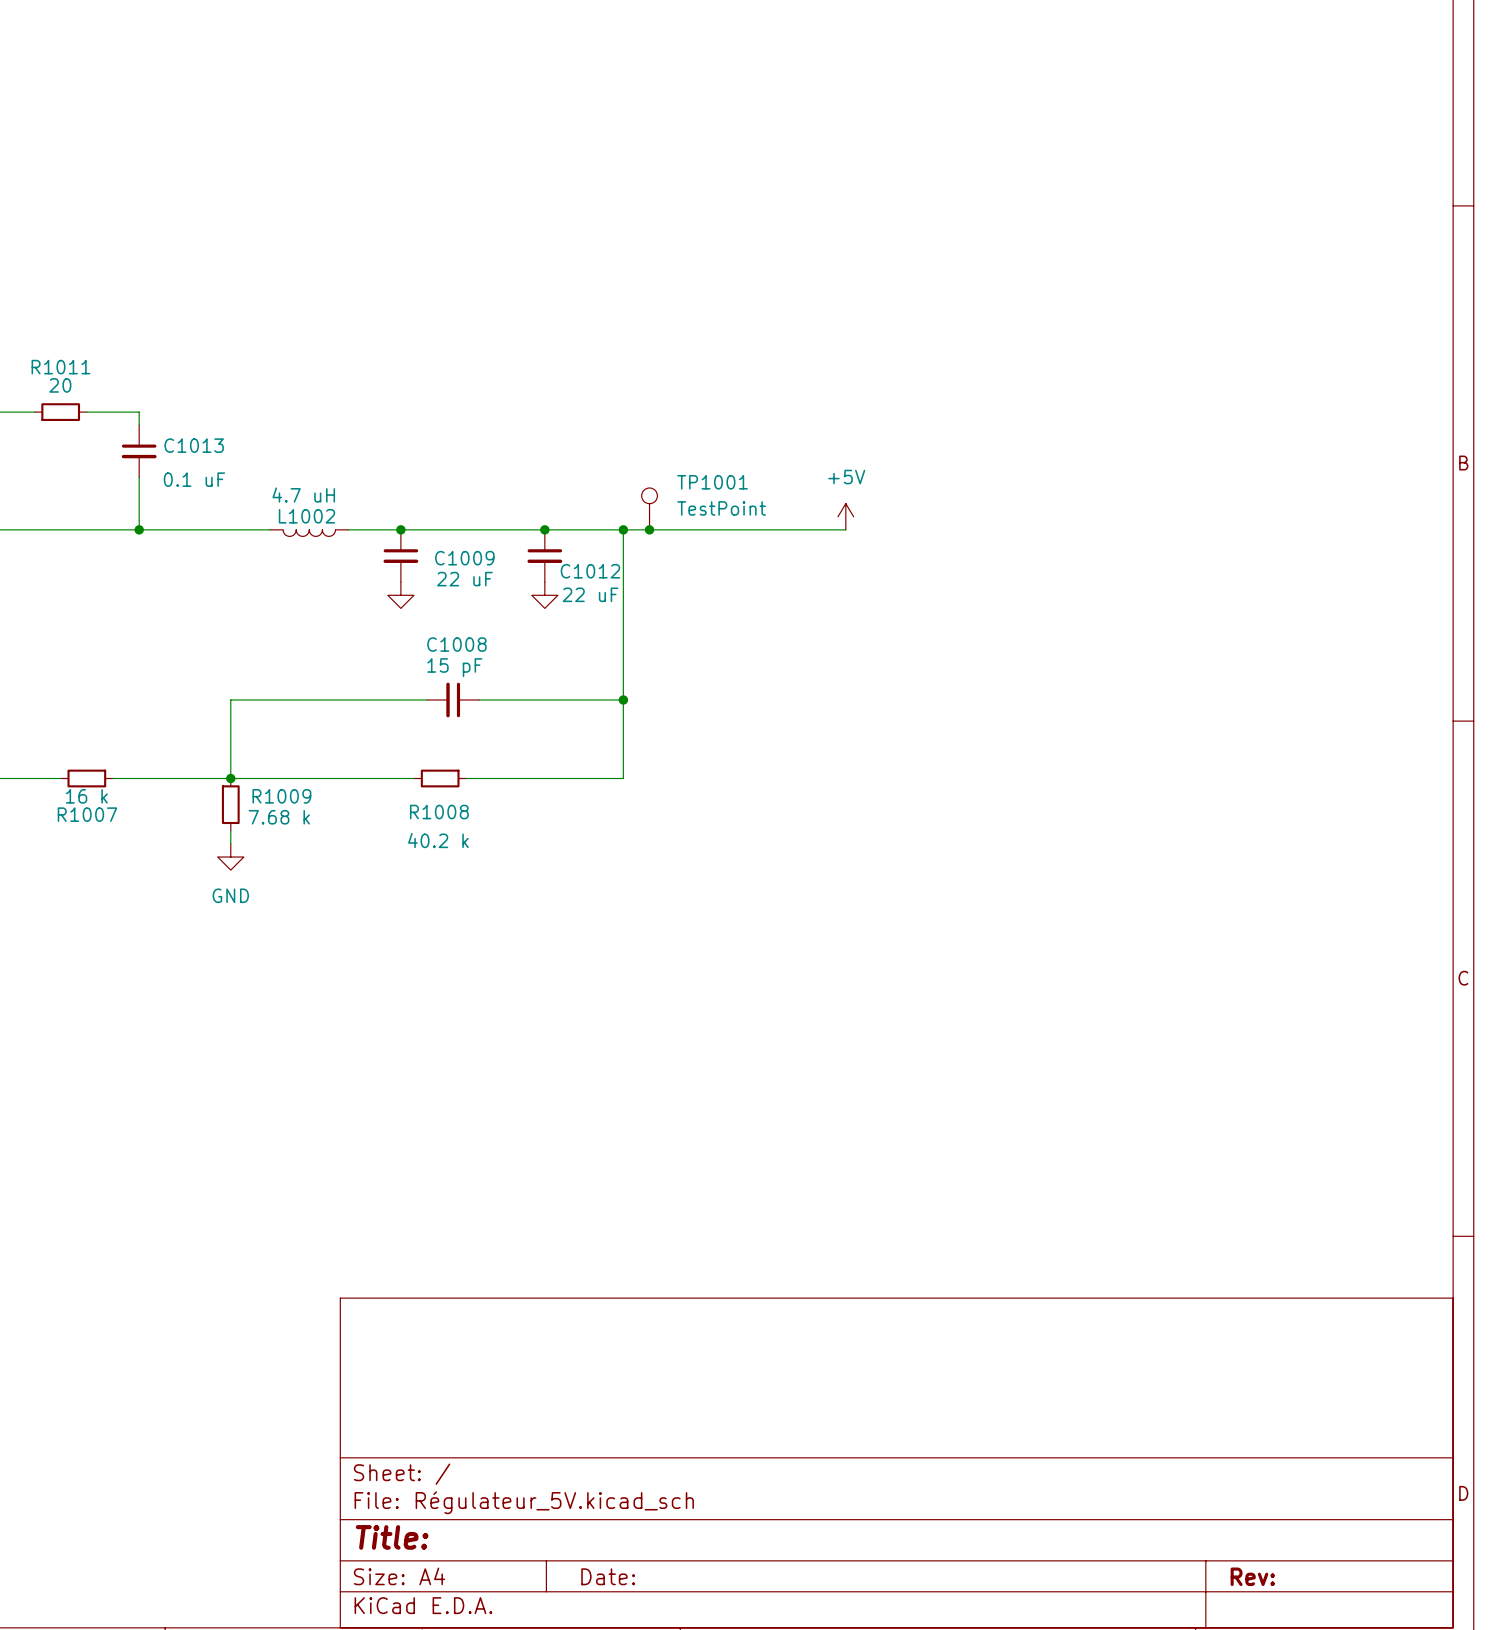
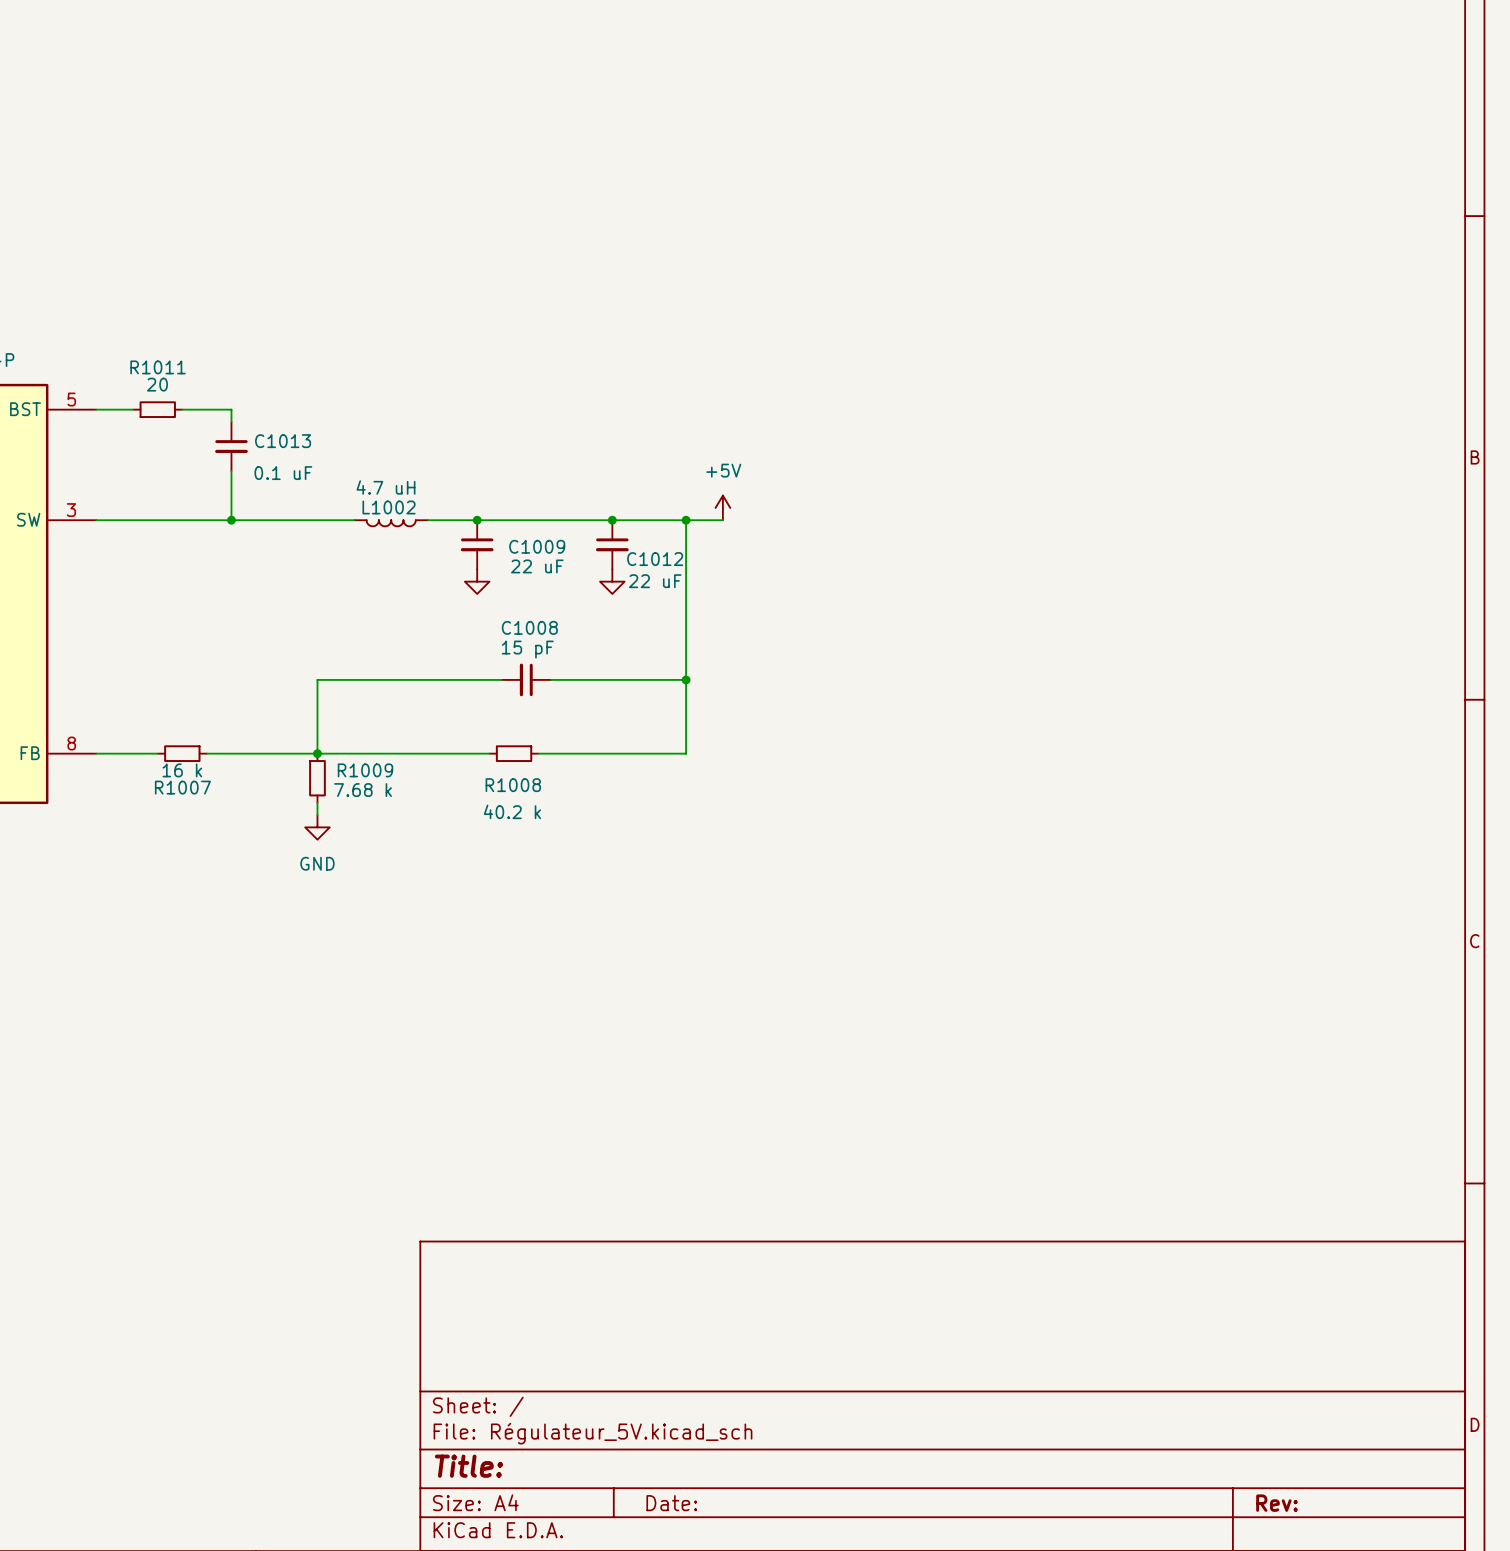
TP1001: TestPoint (649, 508) -> none
power symbol position: +5V (845, 516) -> +5V (722, 507)
junction: (649, 529) -> none
wire: (662, 529) (845, 529) -> none

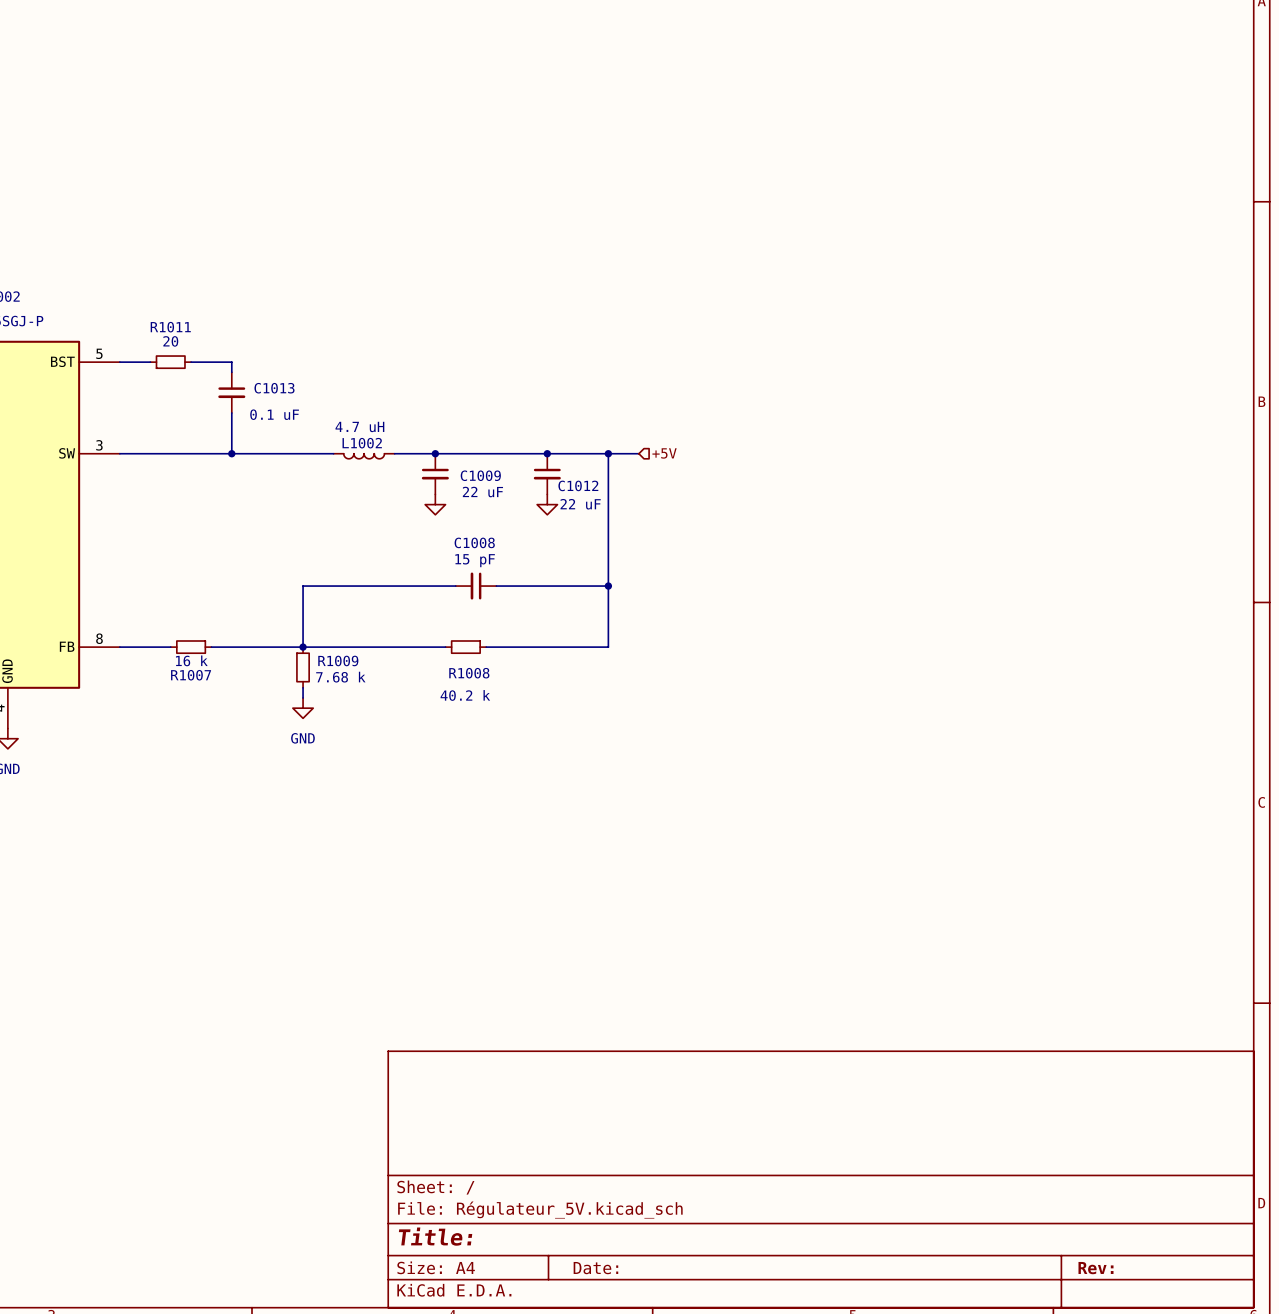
power symbol: +5V (722, 507) -> none
hierarchical label: none -> +5V (664, 453)

